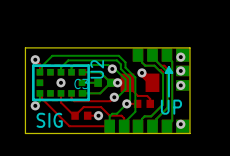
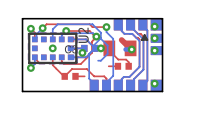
top track: none -> (106, 27) (92, 27) (89, 24) (46, 24) (42, 28)
via: none -> (106, 27)
bottom track: (49, 59) (52, 55) (118, 55) (125, 62) (125, 67) (135, 77) (135, 111) (132, 115) -> (106, 27) (106, 32) (113, 38) (113, 75)
via: none -> (42, 28)
via: none -> (66, 31)
bottom track: (60, 67) (68, 60) (116, 60) (120, 64) (120, 68) (130, 78) (130, 100) (116, 113) (112, 113) (109, 116) (109, 124) -> (52, 35) (52, 29) (57, 24) (92, 24) (100, 32) (100, 38) (89, 53) (89, 78) (94, 83)
via: (141, 72) -> none
line: (168, 72) (168, 96) -> none
bottom track: none -> (131, 49) (125, 49)
via: none -> (131, 49)
via: none -> (82, 52)
top track: (41, 96) (69, 126) (109, 126) -> (36, 60) (38, 62)
top track: (114, 97) (110, 101) (93, 101) -> (66, 31) (89, 31) (93, 34) (91, 52) (80, 64)
via: (114, 97) -> none
via: (126, 103) -> none
text: UP (171, 107) -> none
via: (98, 115) -> none
text: SIG (49, 120) -> none

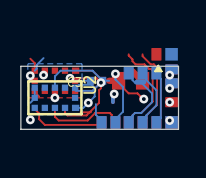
bottom track: (118, 24) (124, 33) (132, 33) (139, 41) (138, 67) -> (128, 73) (135, 83) (141, 83) (152, 93) (152, 102)
part: (118, 24) -> none
bottom track: (130, 24) (143, 39) (142, 70) -> (142, 73) (156, 90) (156, 105)
part: (130, 24) -> none
bottom track: (142, 24) (147, 30) (146, 81) -> (156, 73) (160, 78) (160, 117)
part: (142, 24) -> none
via: (154, 26) -> none
bottom track: (106, 27) (106, 32) (113, 38) (113, 53) -> (115, 73) (115, 79) (123, 87)
top track: (106, 27) (92, 27) (89, 24) (46, 24) (42, 28) -> none
via: (106, 27) -> none
via: (30, 28) -> none
via: (42, 28) -> none
top track: (66, 31) (89, 31) (93, 34) (91, 52) (80, 64) (63, 64) (61, 57) -> (70, 78) (96, 78) (100, 82) (99, 102) (86, 115) (67, 115) (65, 112) (65, 107)
via: (66, 31) -> none
board edge: (162, 35) (162, 18) (22, 18) (22, 35) -> (178, 66) (20, 66)
via: (96, 36) -> none
via: (154, 38) -> none
bottom track: (52, 39) (52, 29) (57, 24) (92, 24) (100, 32) (100, 38) (89, 53) (89, 69) -> none
bottom track: (61, 39) (63, 33) (93, 33) (107, 45) (107, 53) (100, 60) (98, 60) -> none
bottom track: none -> (75, 70) (60, 70) (54, 76) (54, 87)
part: none -> (128, 73)
part: none -> (142, 73)
part: none -> (156, 73)
via: none -> (115, 73)
via: none -> (30, 75)
via: none -> (43, 75)
via: none -> (169, 75)
via: none -> (70, 78)
U2 position: (52, 48) -> (54, 97)
via: (52, 48) -> none
via: (100, 48) -> none
via: (131, 49) -> none
via: none -> (100, 82)
via: (154, 50) -> none
via: (82, 52) -> none
bottom track: none -> (75, 87) (79, 84) (91, 84) (94, 87) (94, 96) (83, 107) (75, 107)
via: none -> (169, 88)
top track: (52, 57) (52, 65) (63, 76) (72, 69) (86, 69) (94, 76) (104, 76) (106, 78) (106, 85) -> none
bottom track: none -> (114, 94) (112, 102)
via: none -> (114, 94)
via: none -> (54, 97)
via: none -> (143, 99)
top track: (117, 66) (108, 66) -> none
part: (123, 66) -> none
via: (30, 67) -> none
via: none -> (88, 102)
via: none -> (169, 102)
part: none -> (171, 102)
top track: none -> (34, 107) (39, 113) (39, 119) (44, 124) (99, 124) (101, 122)
top track: none -> (54, 107) (54, 116) (58, 120) (87, 120) (95, 112) (109, 112) (111, 118)
part: (70, 76) -> none
via: none -> (30, 119)

